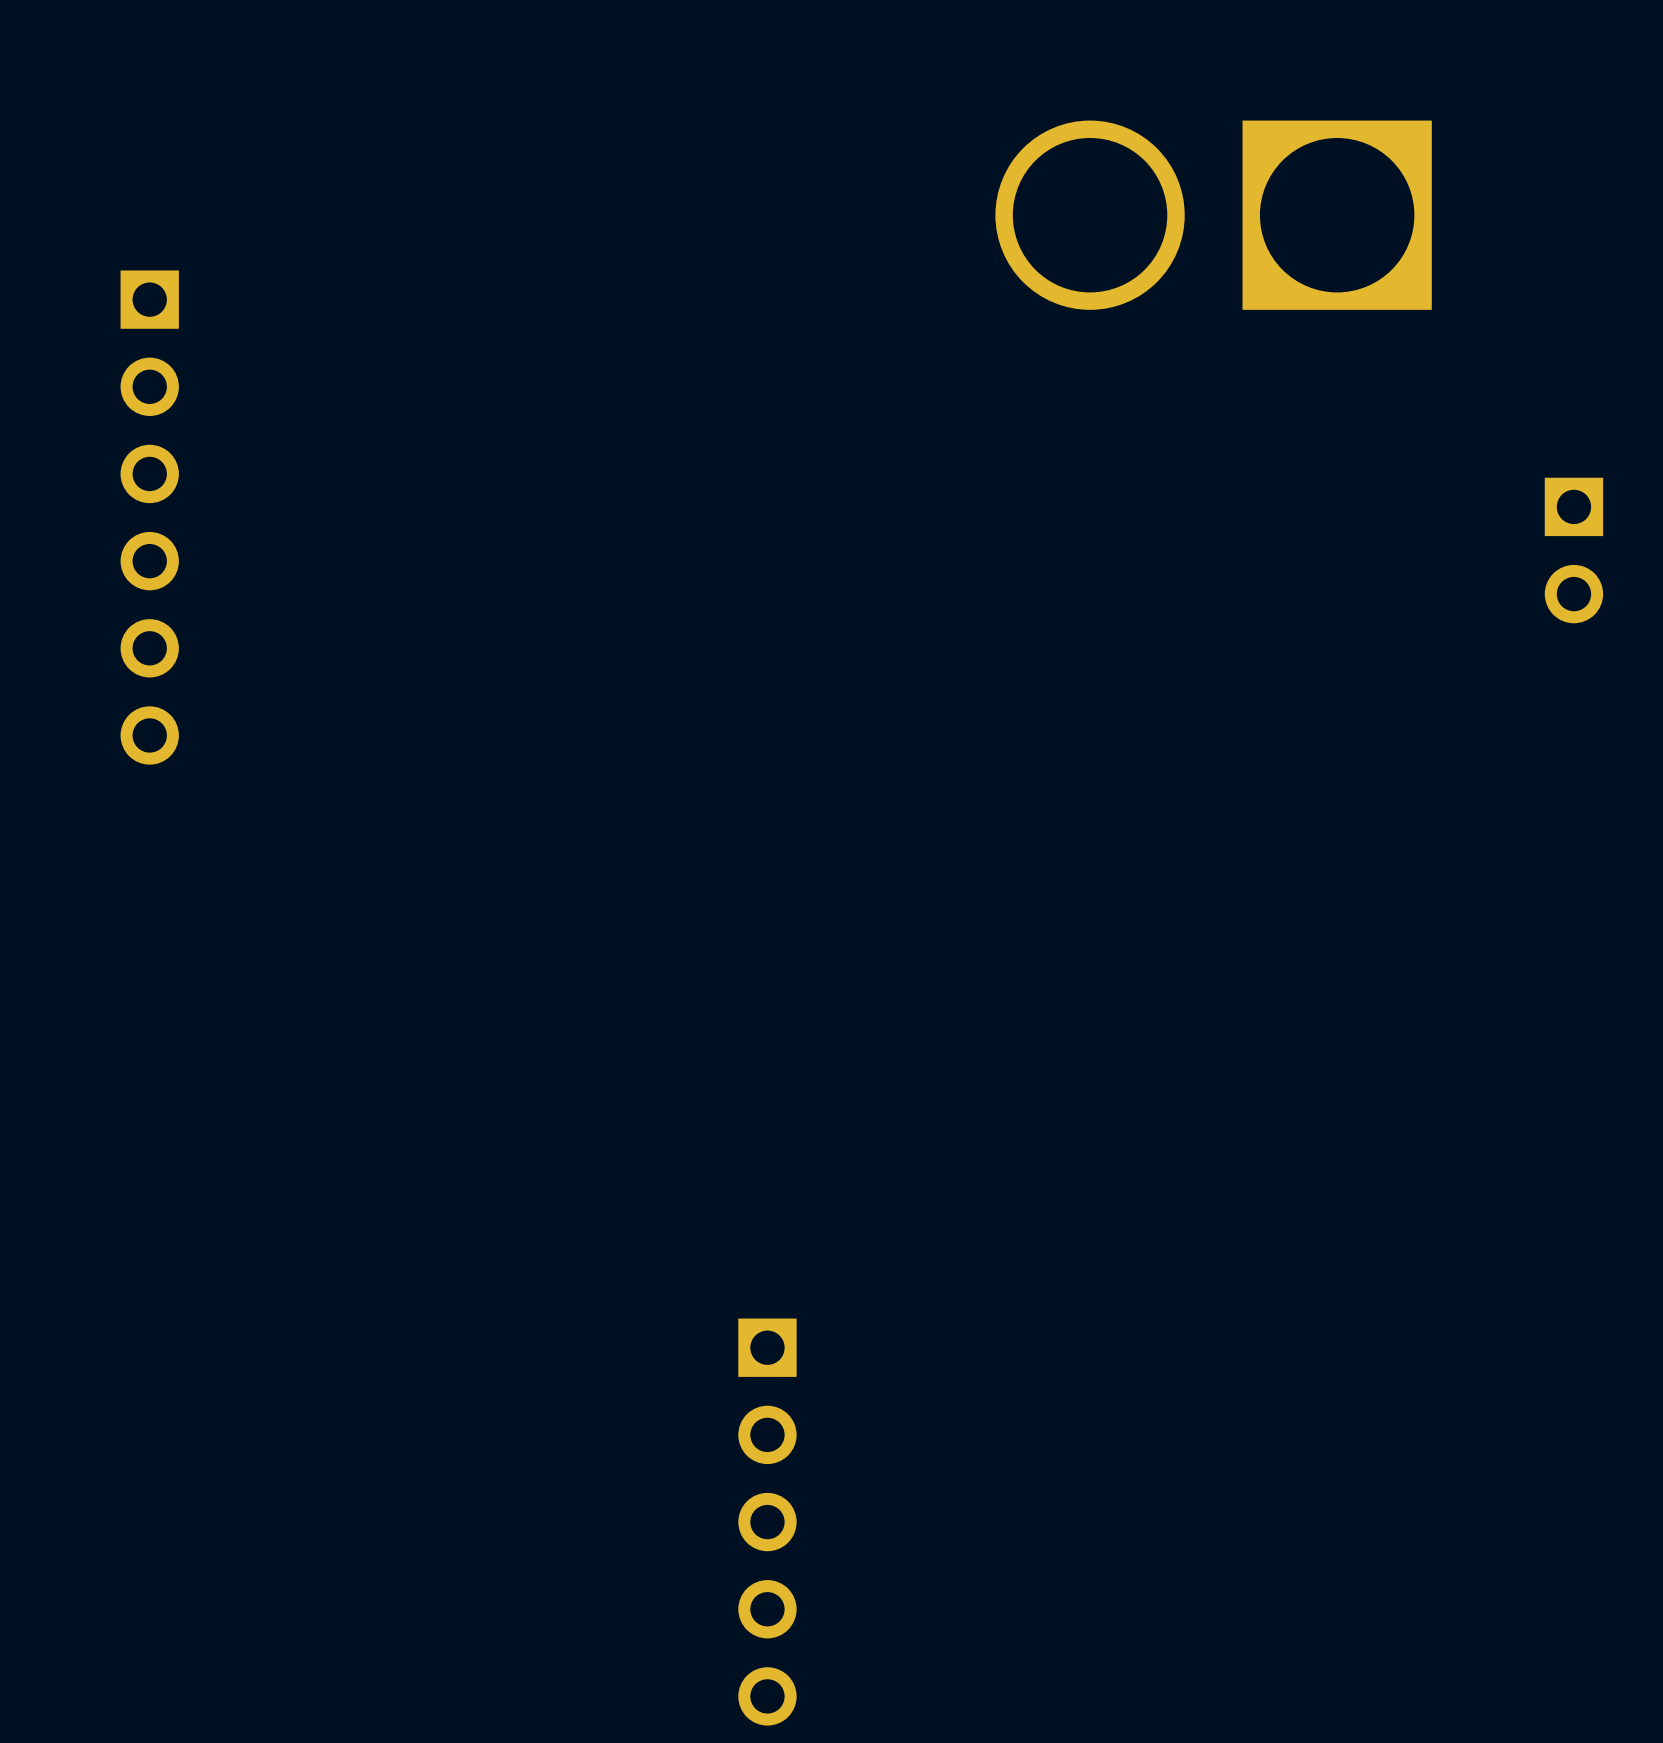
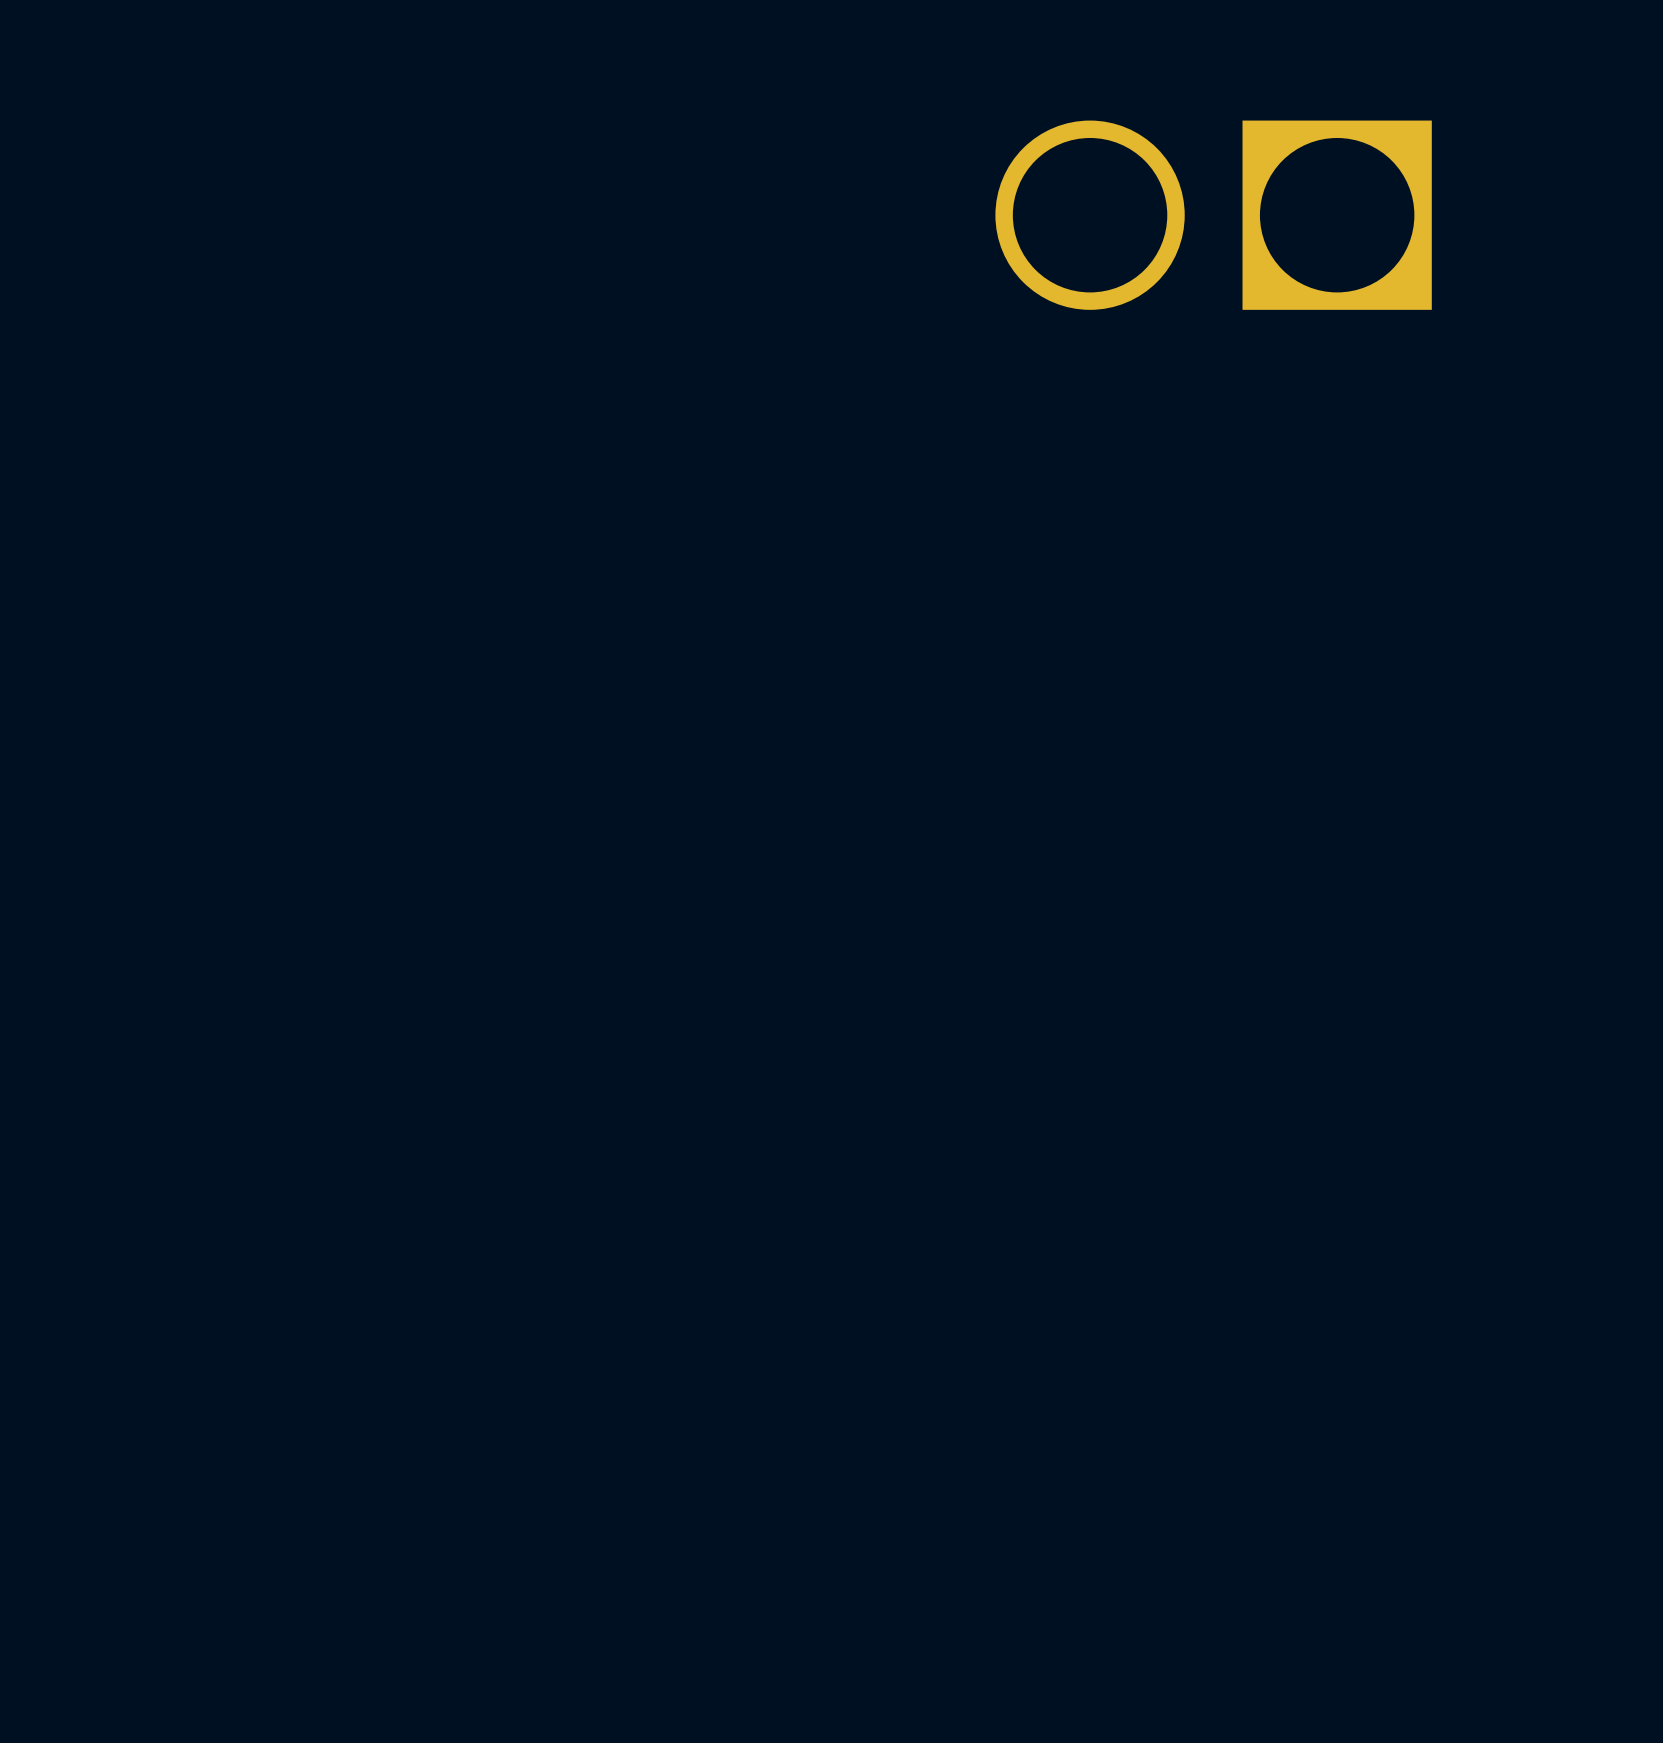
part: (149, 517) -> none
part: (1573, 550) -> none
part: (767, 1522) -> none

